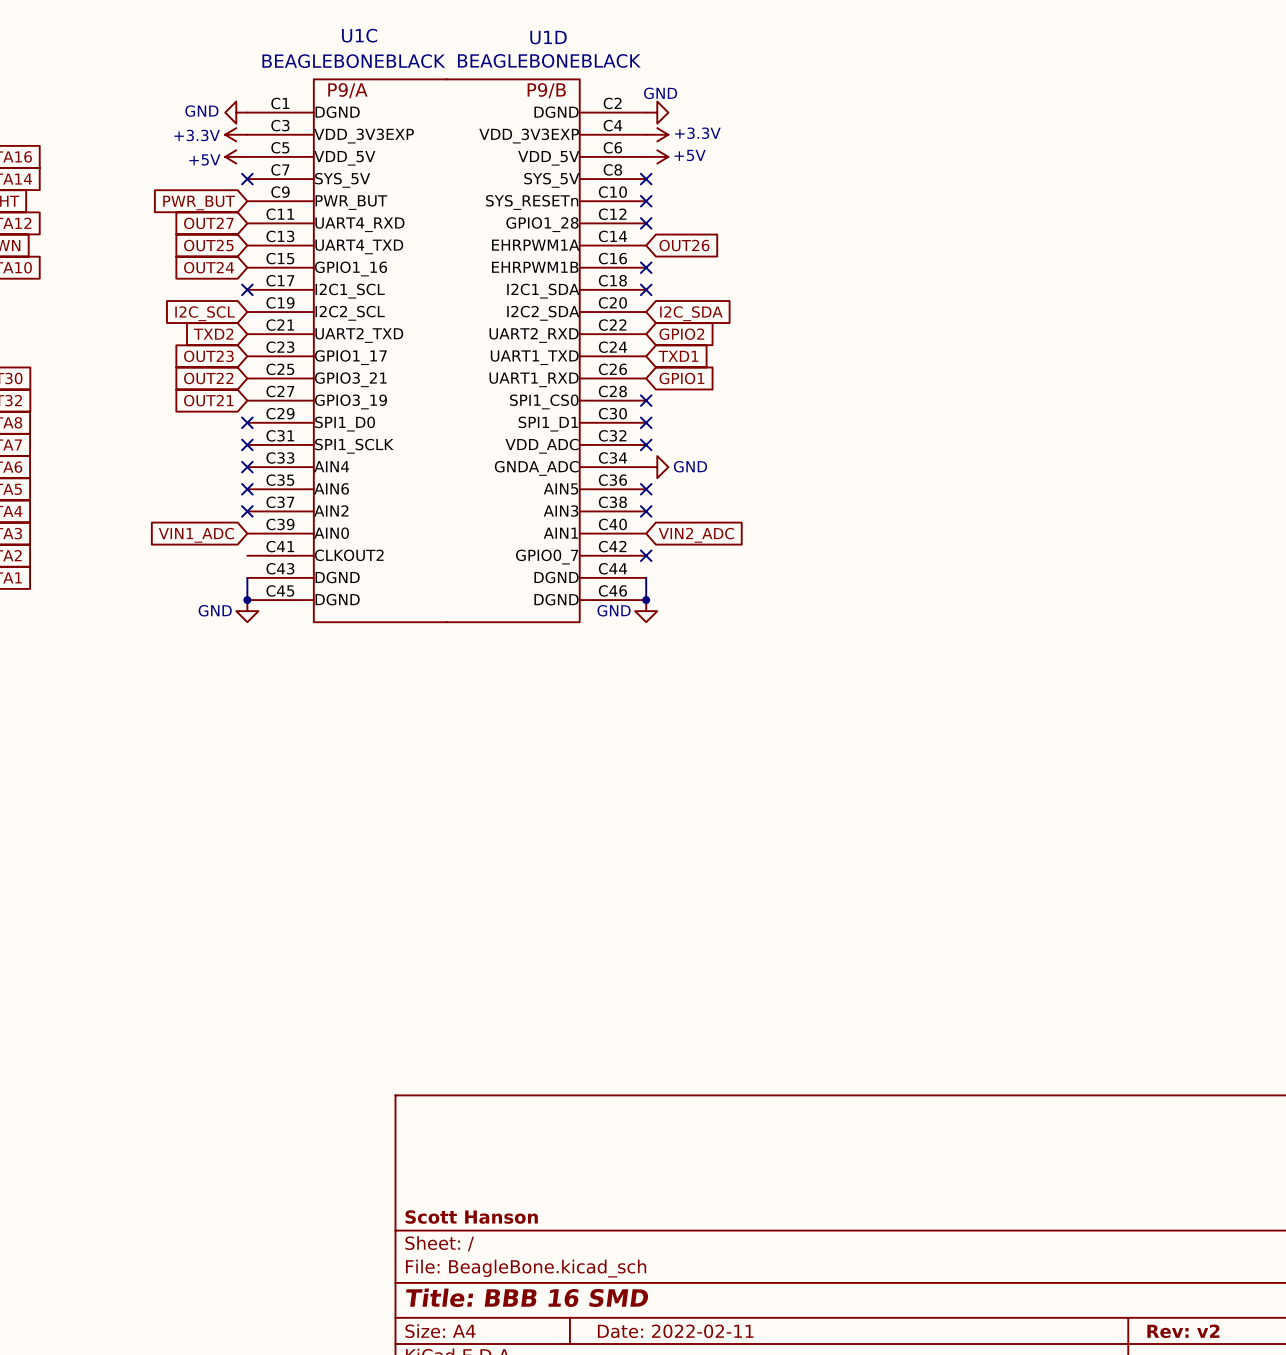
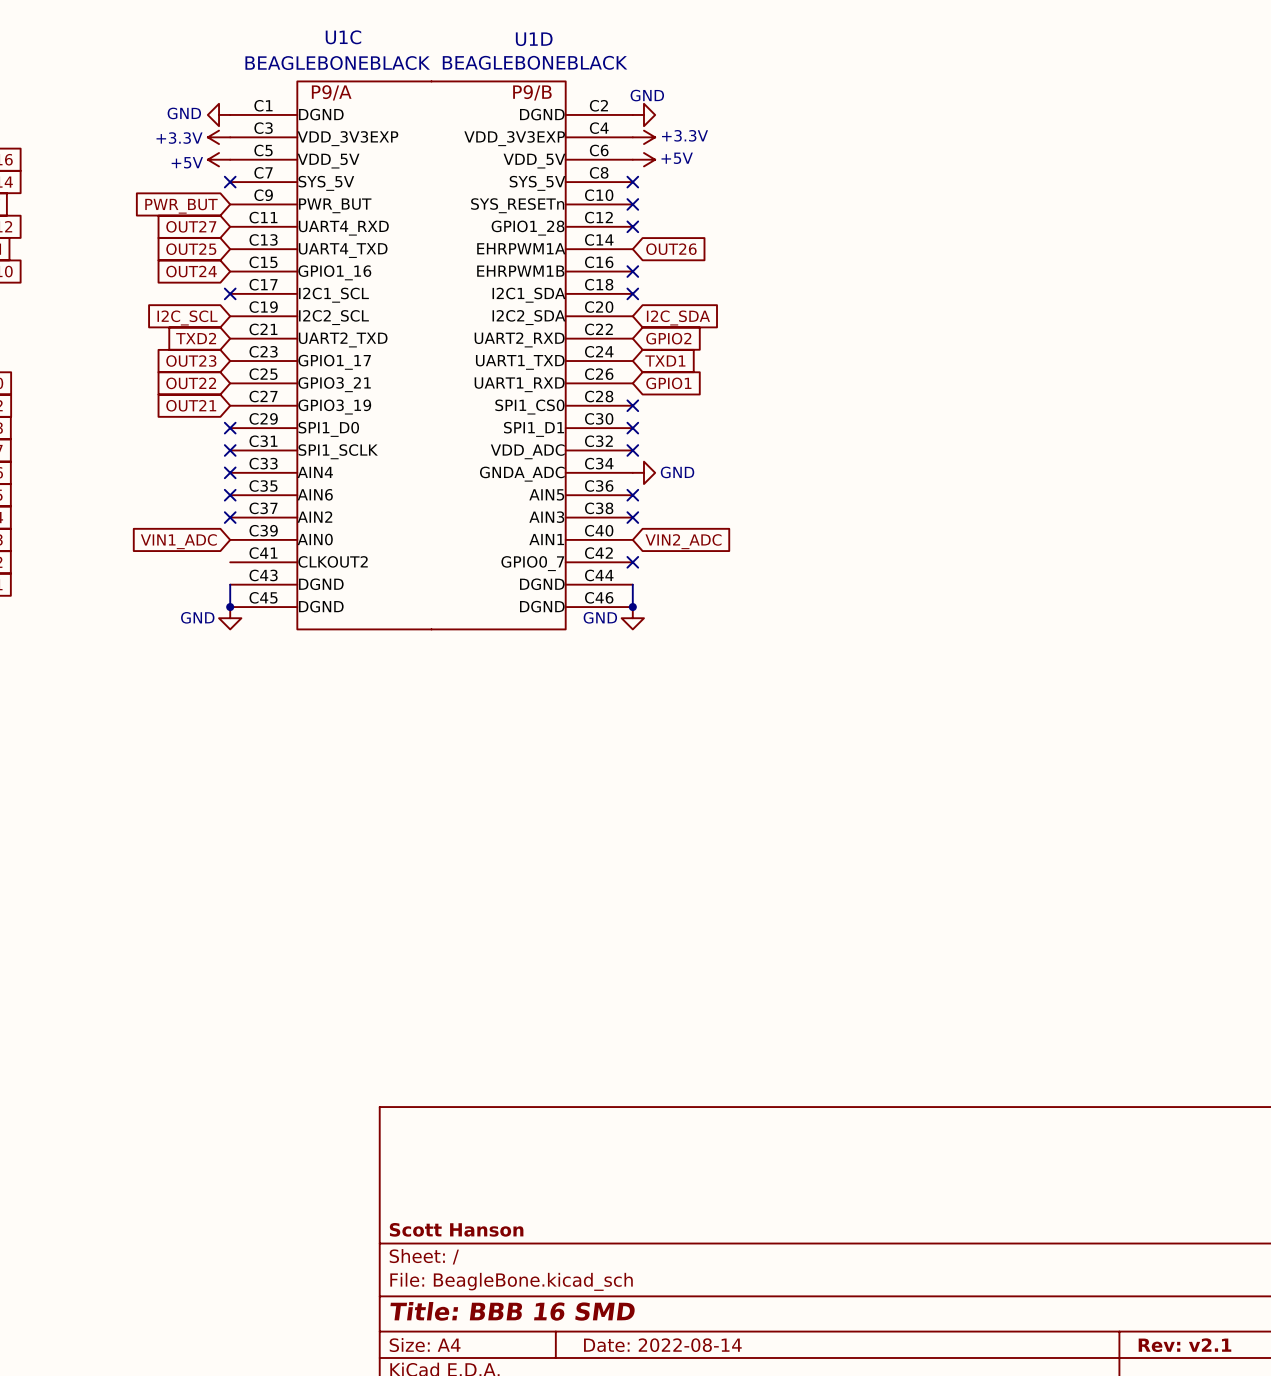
title block: Date: 2022-02-11 (675, 1331) -> Date: 2022-08-14 (662, 1345)
title block: Rev: v2 (1183, 1331) -> Rev: v2.1 (1184, 1345)

